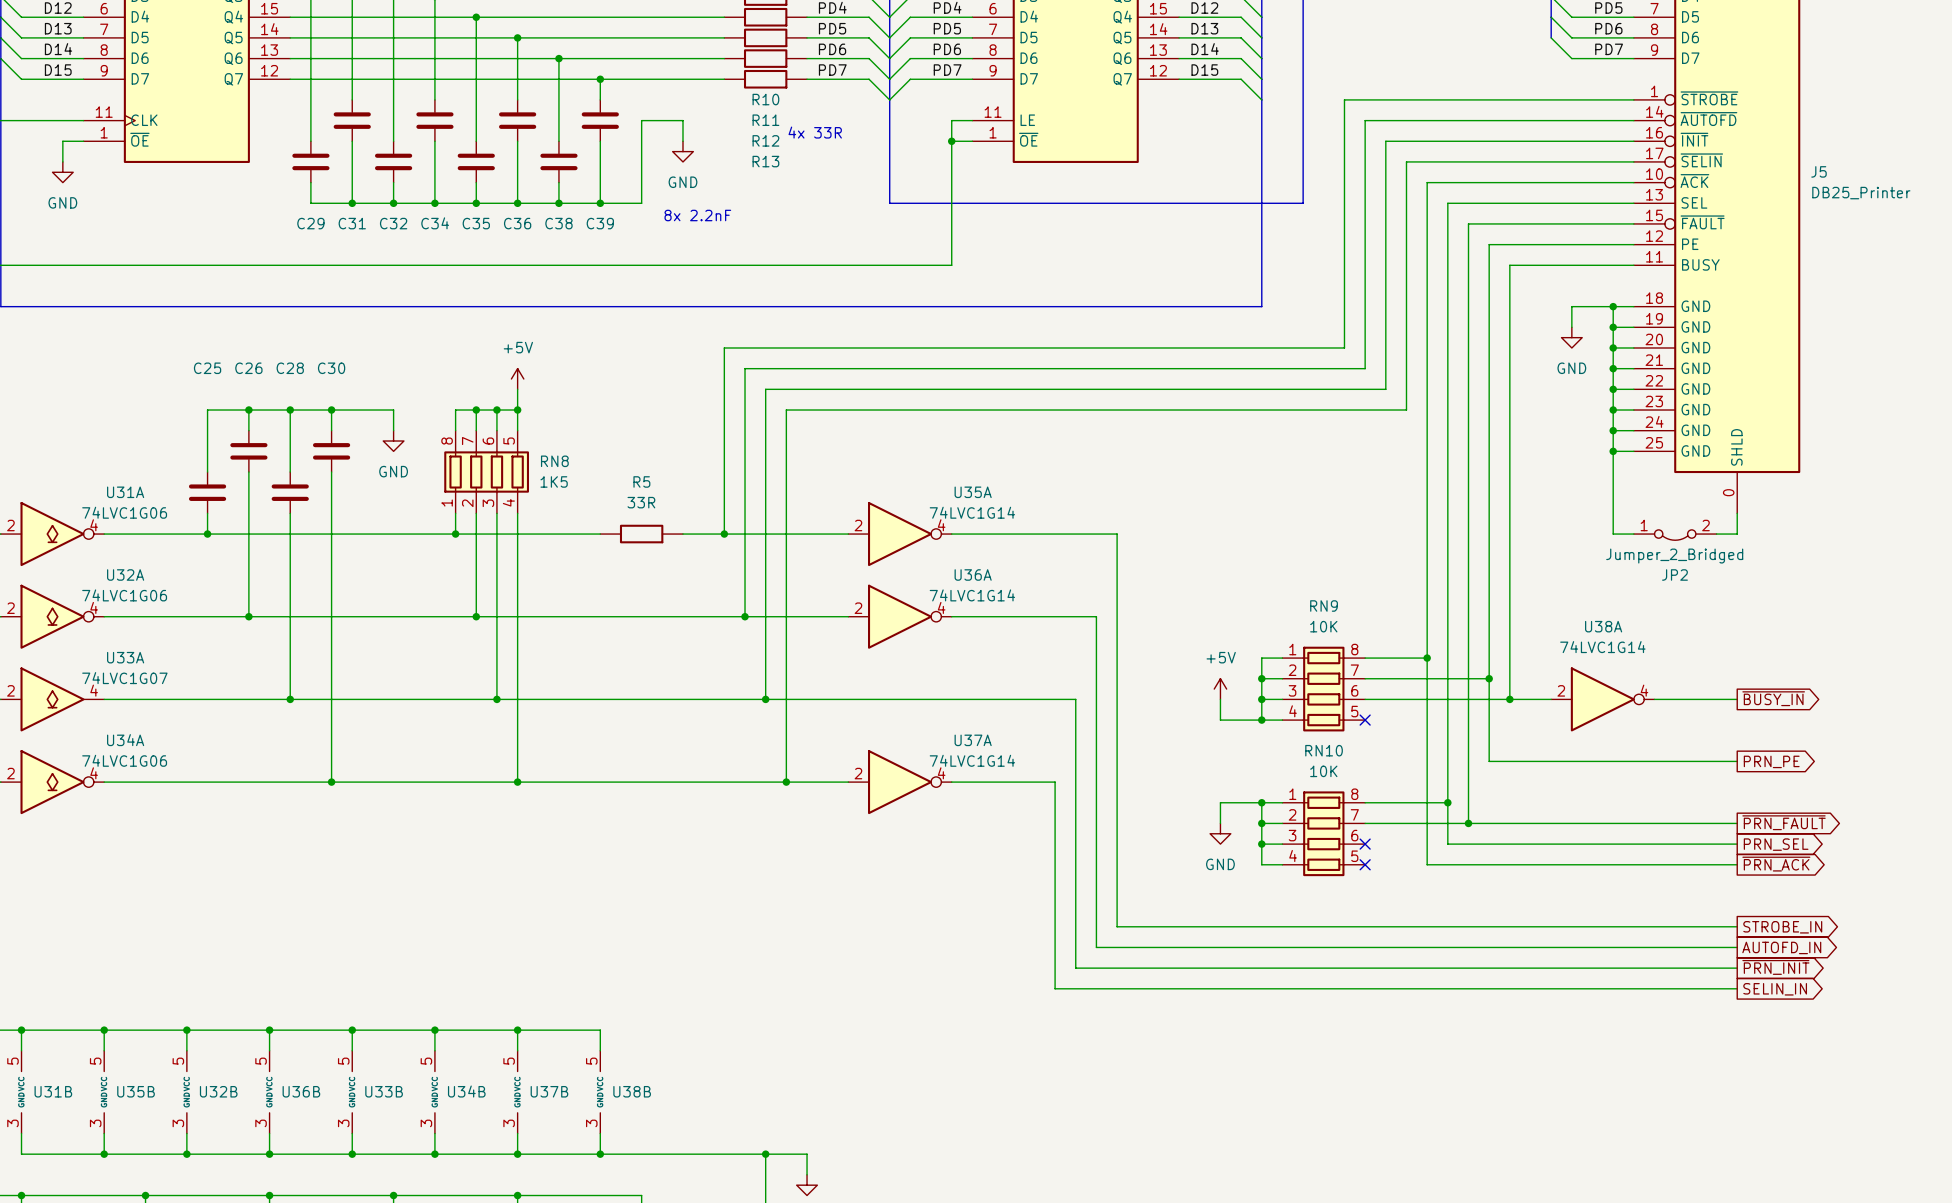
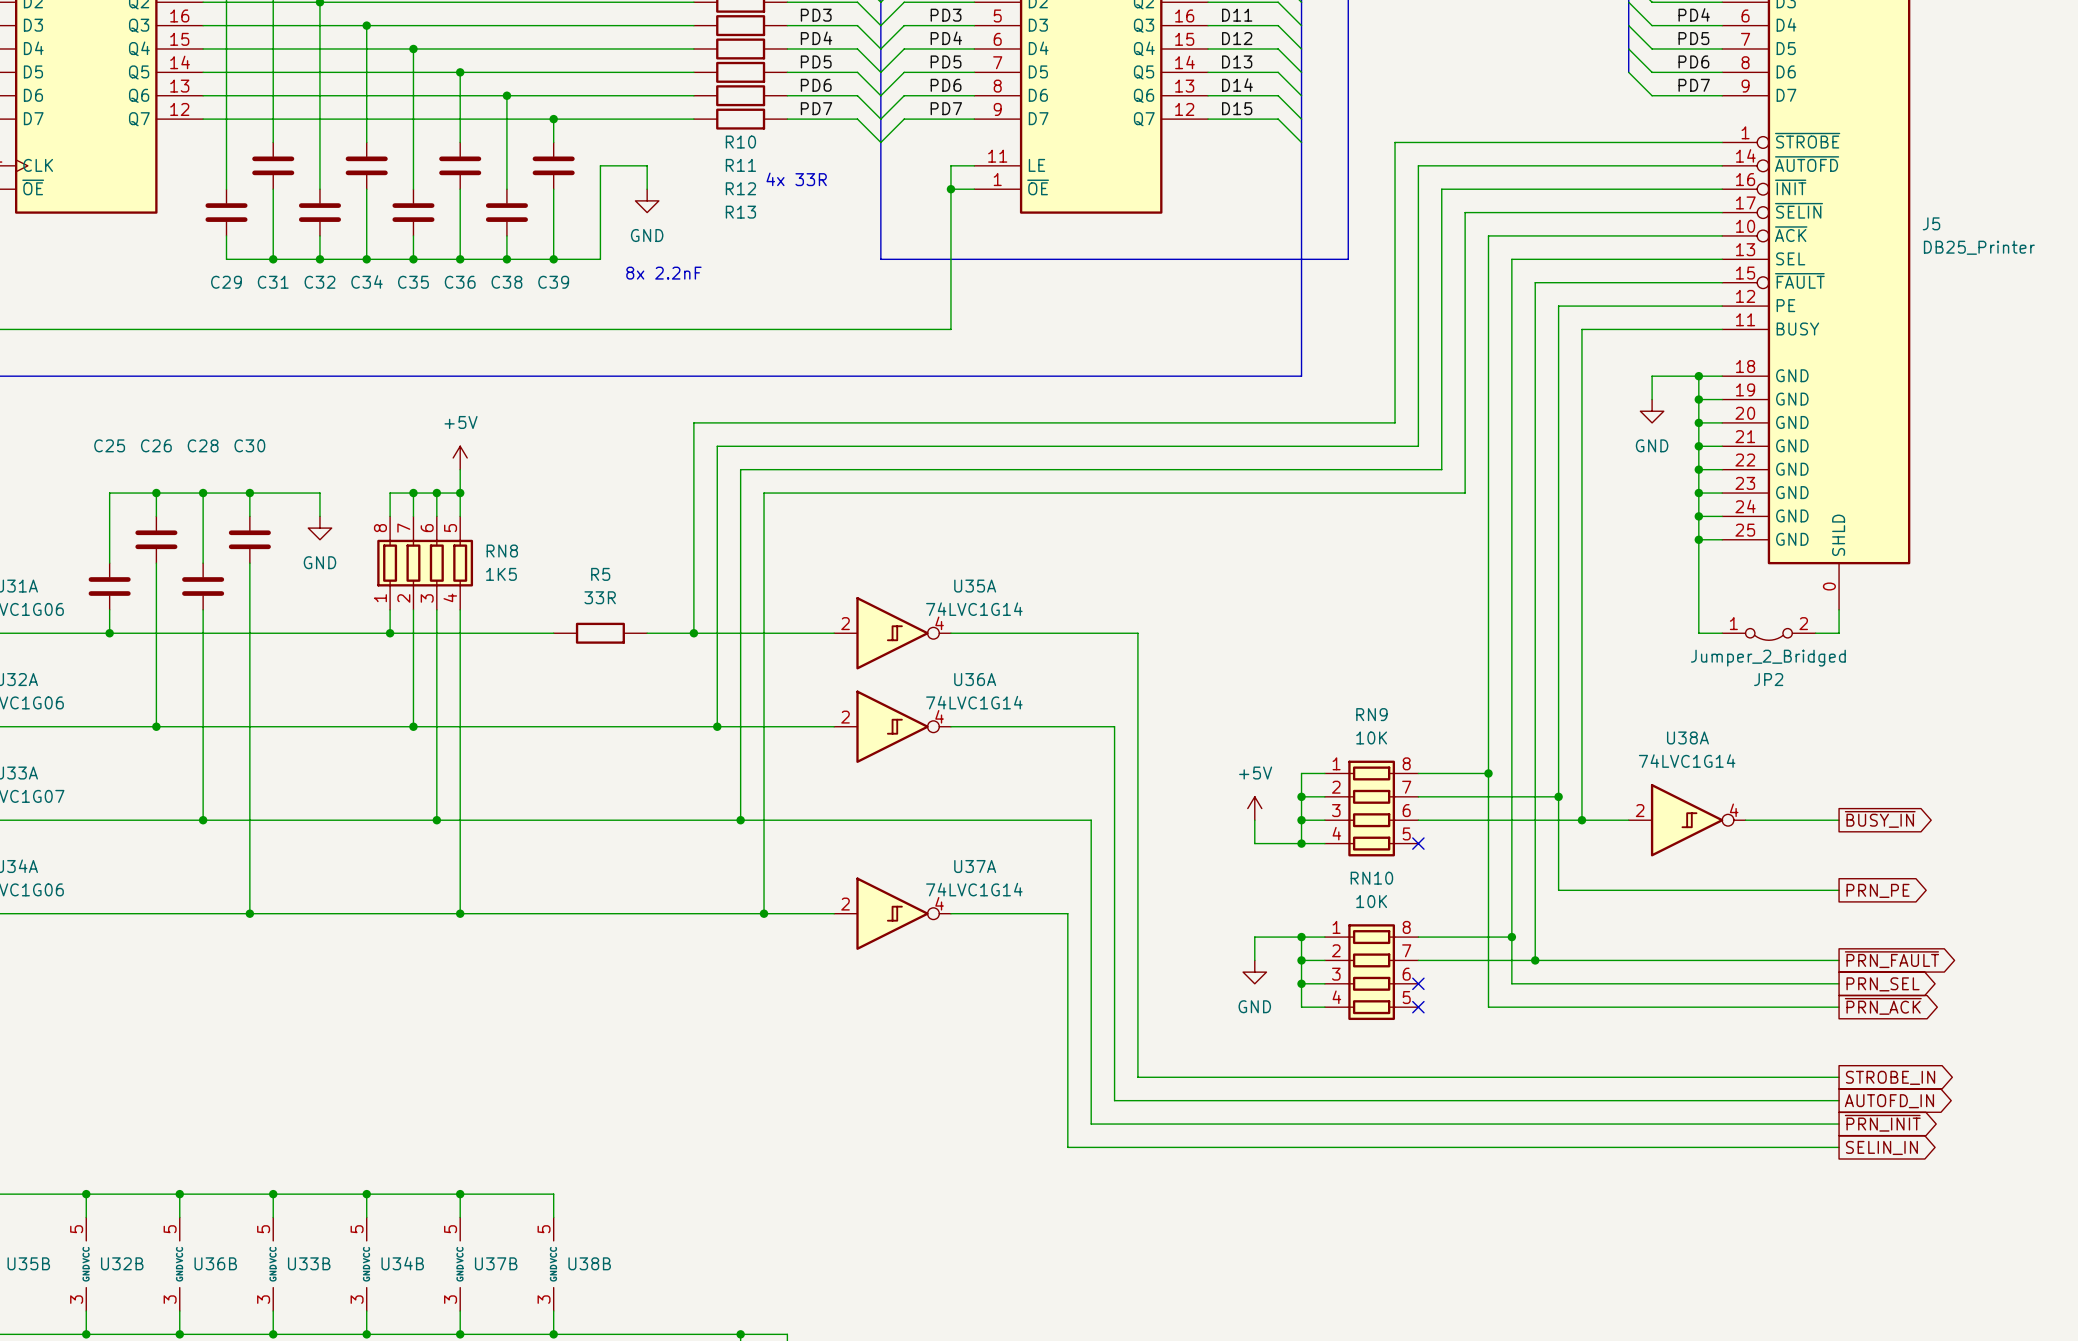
U35A symbol: [848, 501, 952, 567] -> [834, 597, 951, 670]
U36A symbol: [848, 584, 952, 649] -> [834, 690, 951, 763]
U38A symbol: [1551, 667, 1655, 732] -> [1628, 783, 1746, 857]
U37A symbol: [848, 750, 952, 815] -> [834, 877, 951, 950]

